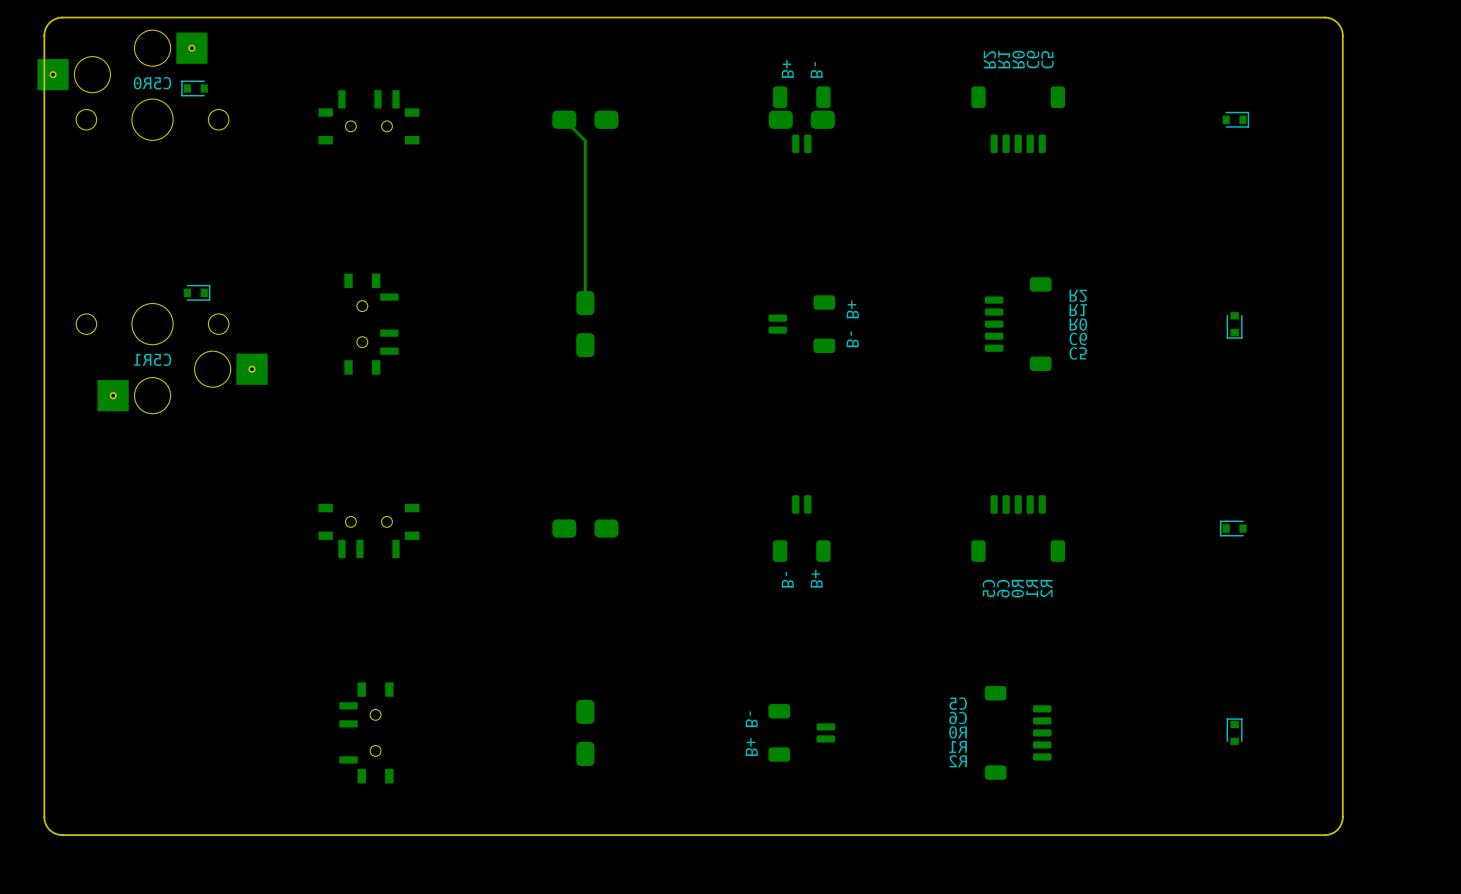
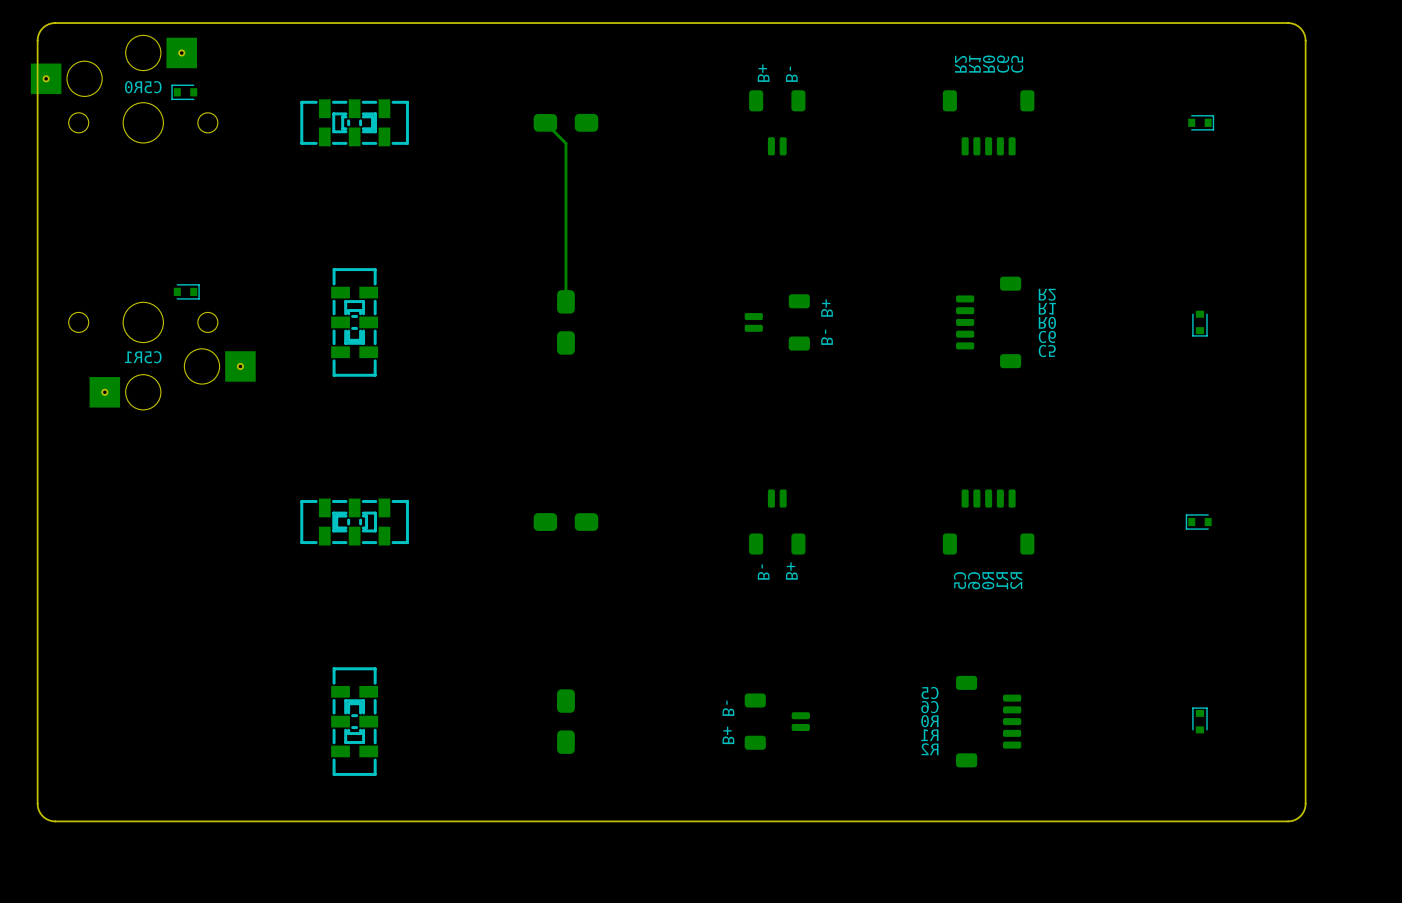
part footprint: [318, 90, 420, 145] -> [300, 99, 409, 147]
part: (801, 119) -> none
part footprint: [344, 273, 399, 375] -> [331, 268, 379, 377]
part footprint: [318, 503, 420, 559] -> [300, 498, 409, 546]
part footprint: [339, 682, 394, 784] -> [331, 667, 379, 776]

